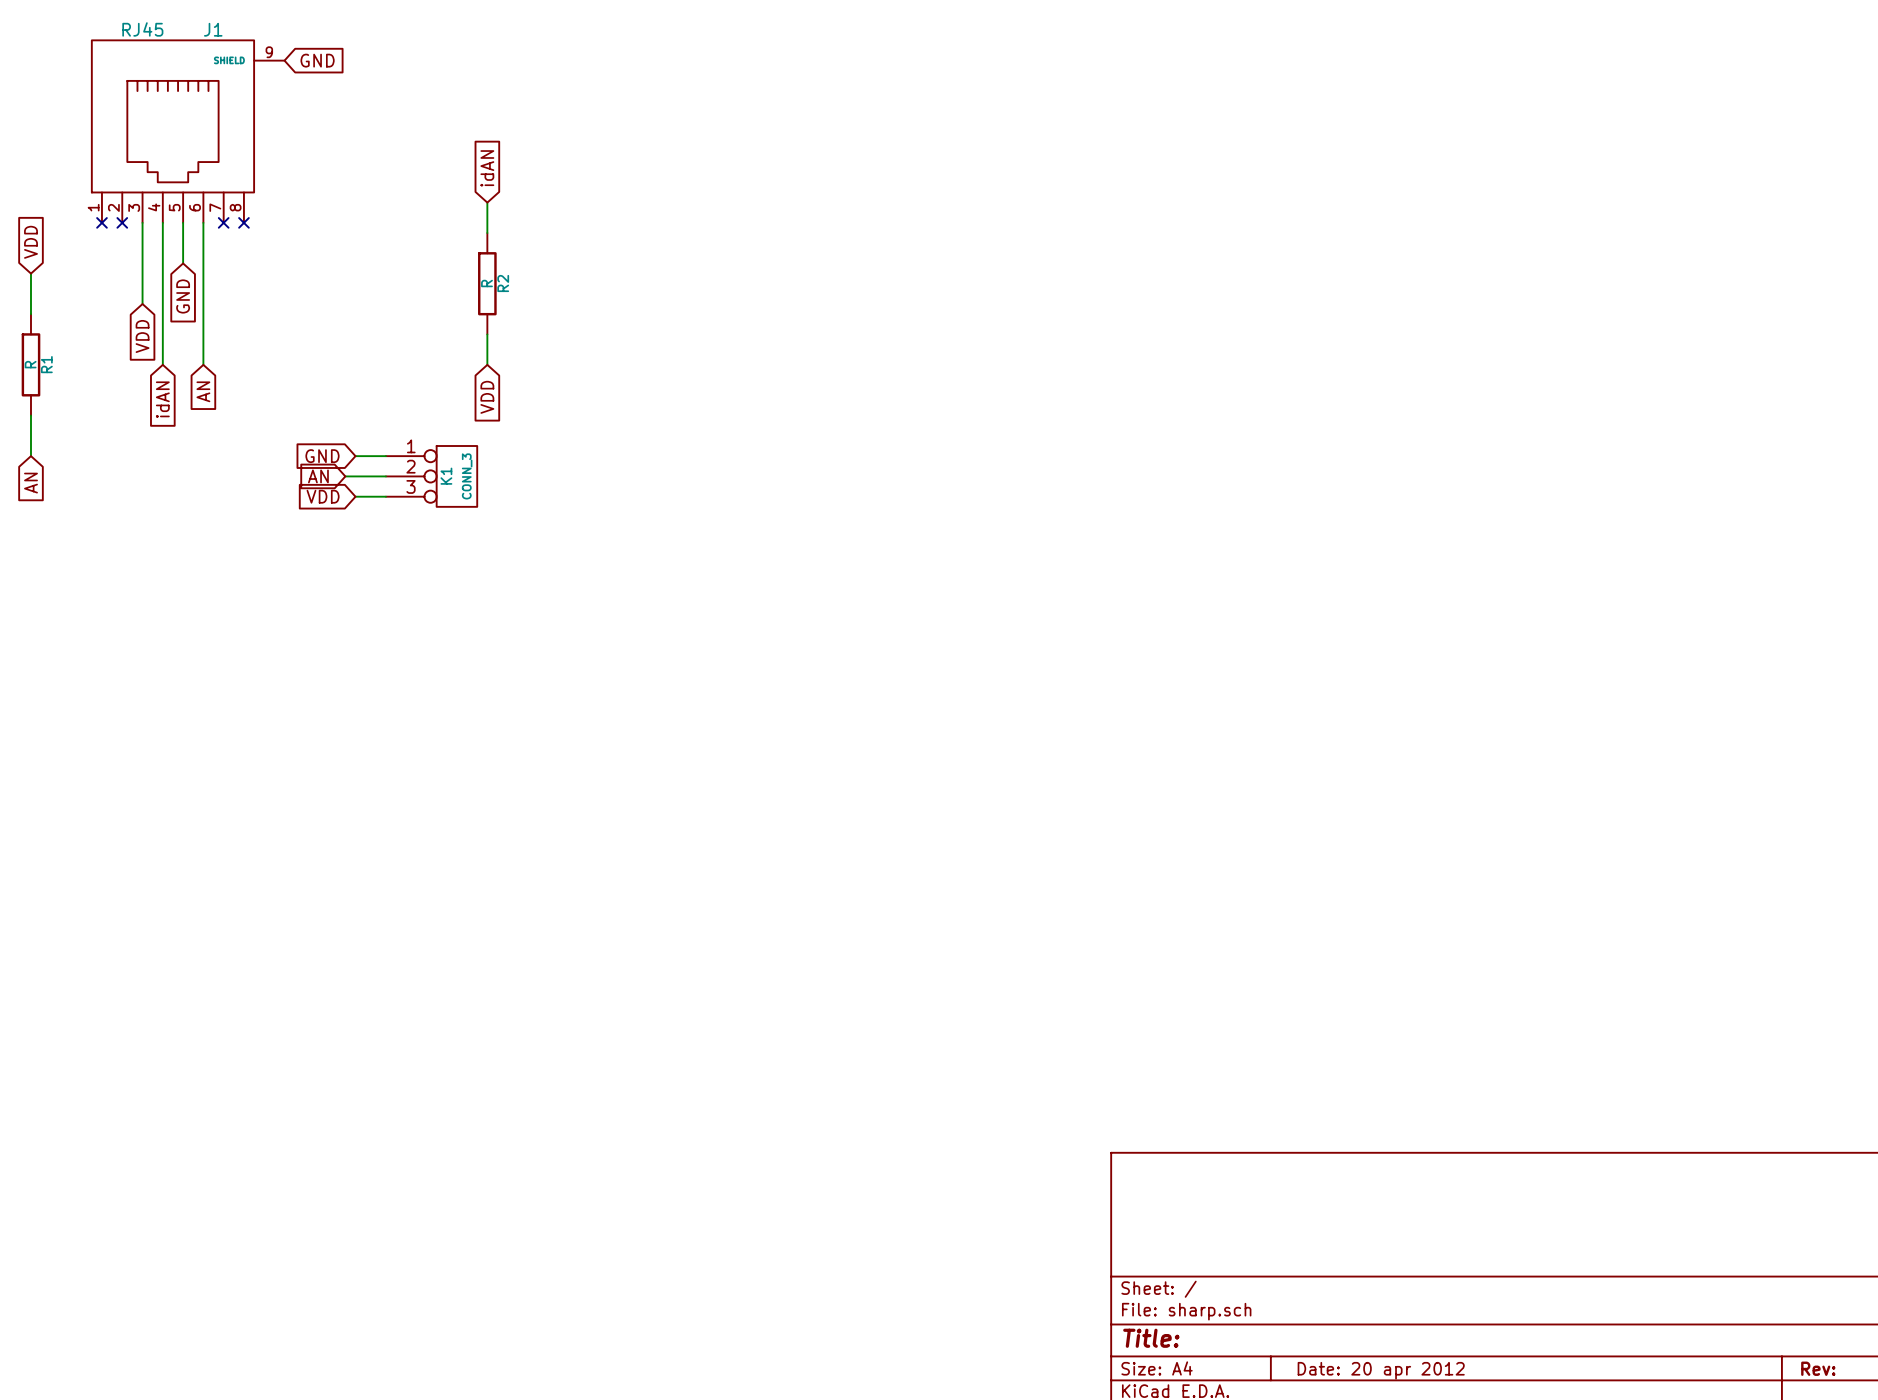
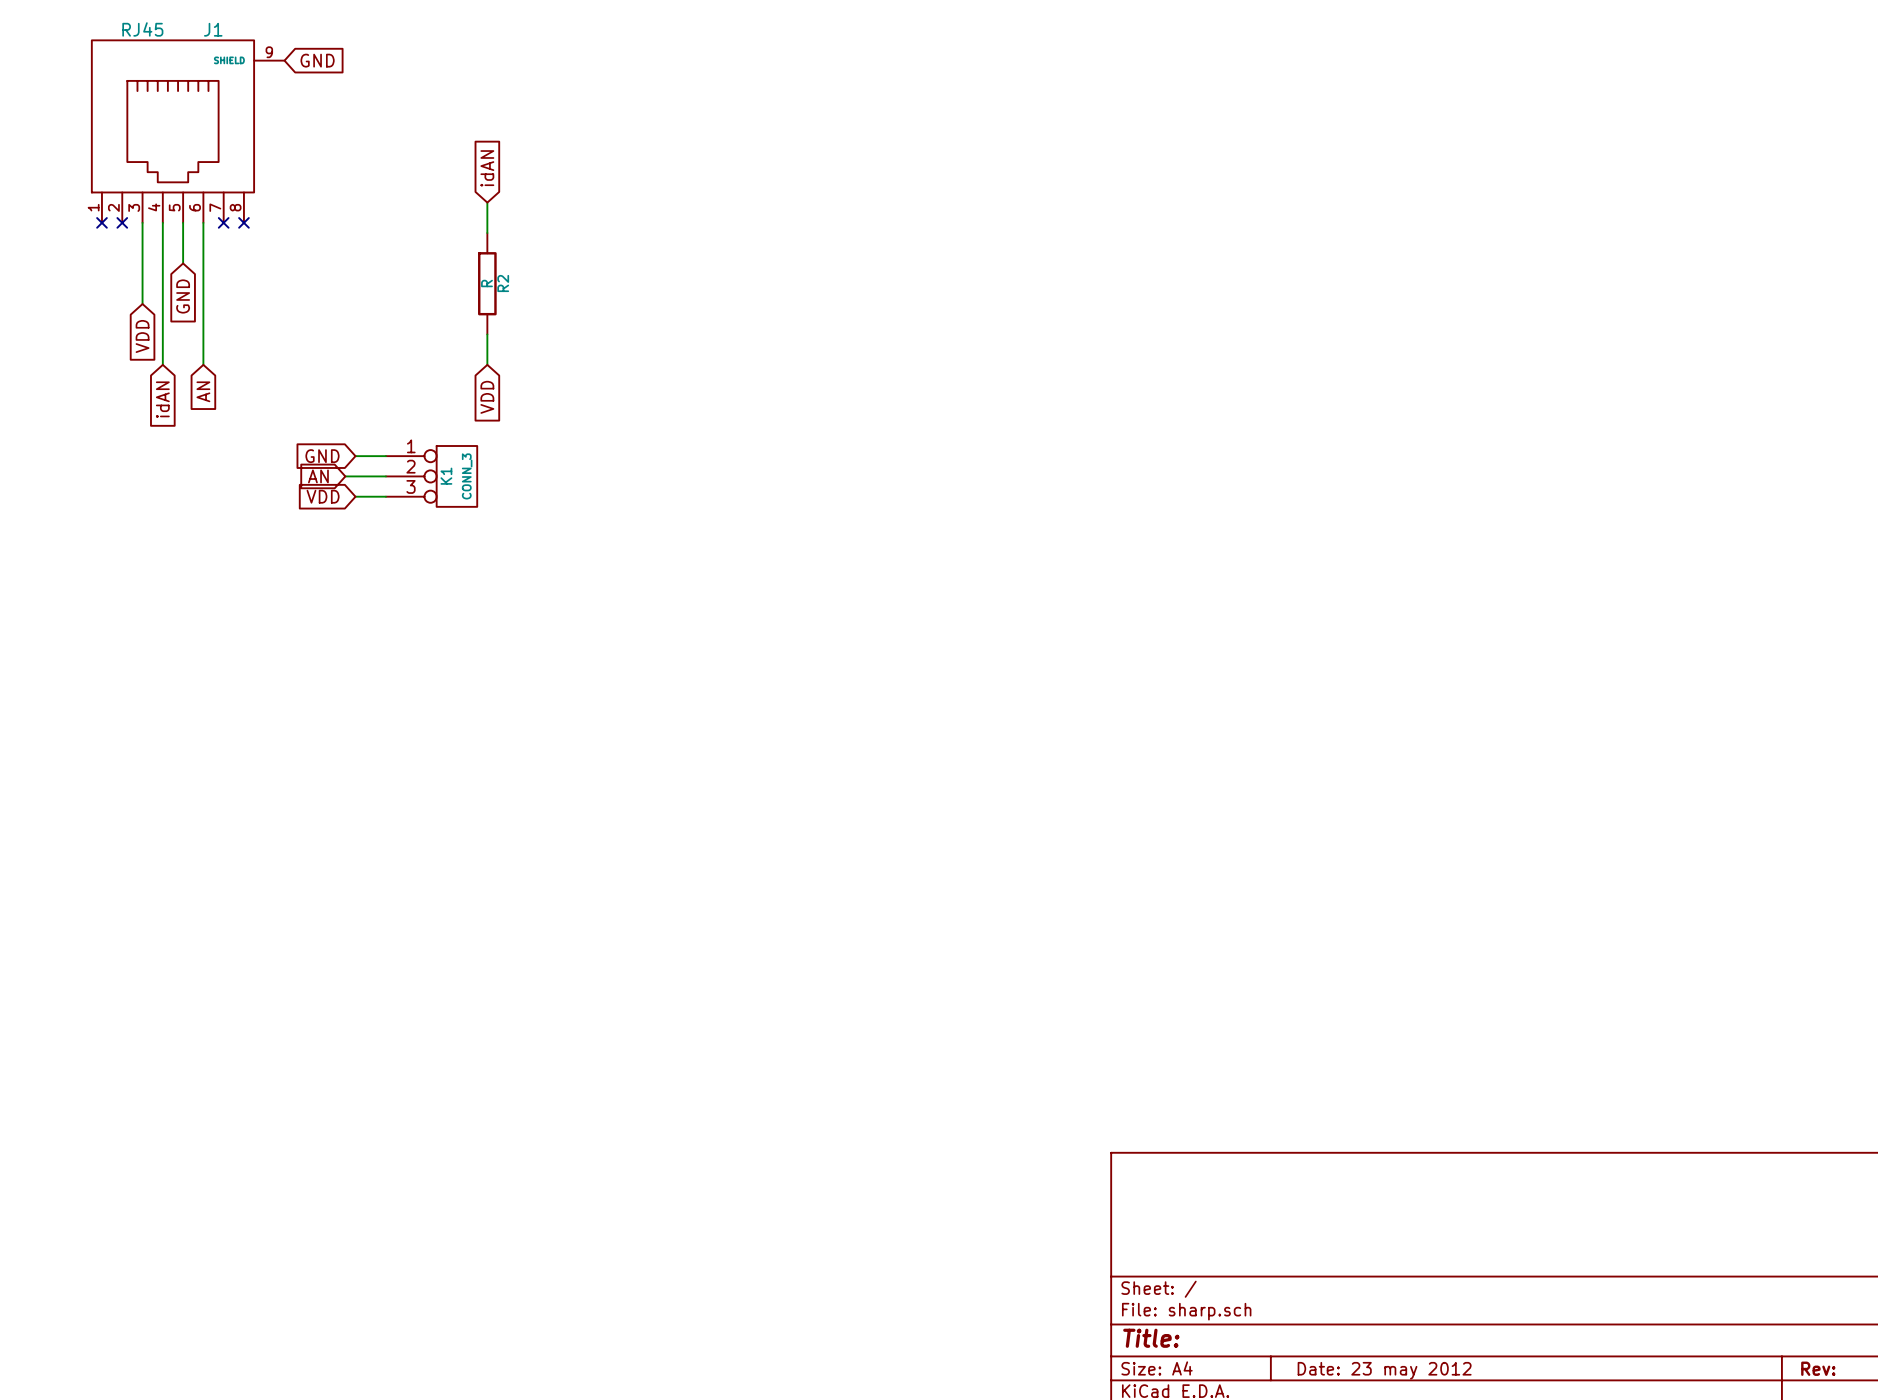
global label: VDD (30, 242) -> none
wire: (30, 273) (30, 314) -> none
R1: R (30, 364) -> none
wire: (30, 415) (30, 456) -> none
global label: AN (30, 483) -> none
title block: Date: 20 apr 2012 (1381, 1370) -> Date: 23 may 2012 (1384, 1370)

